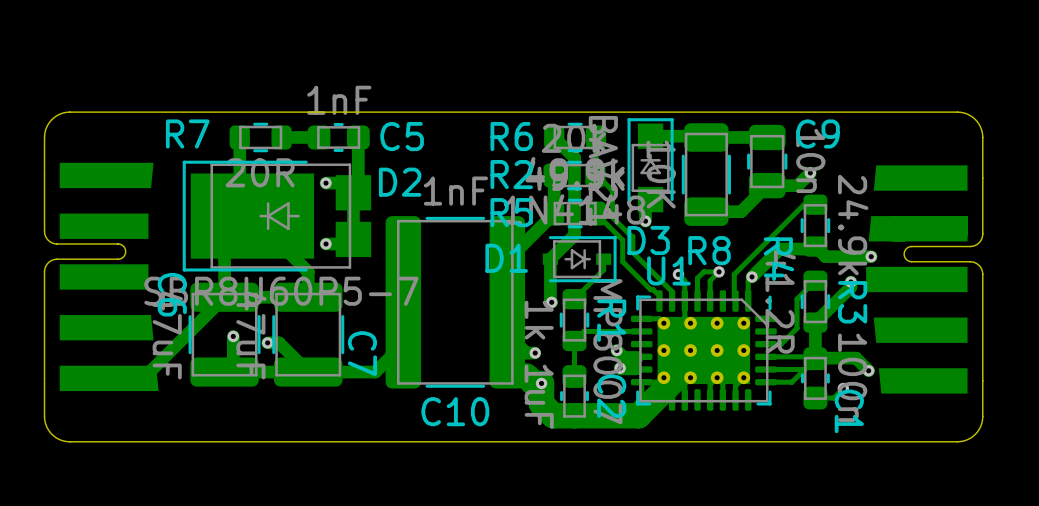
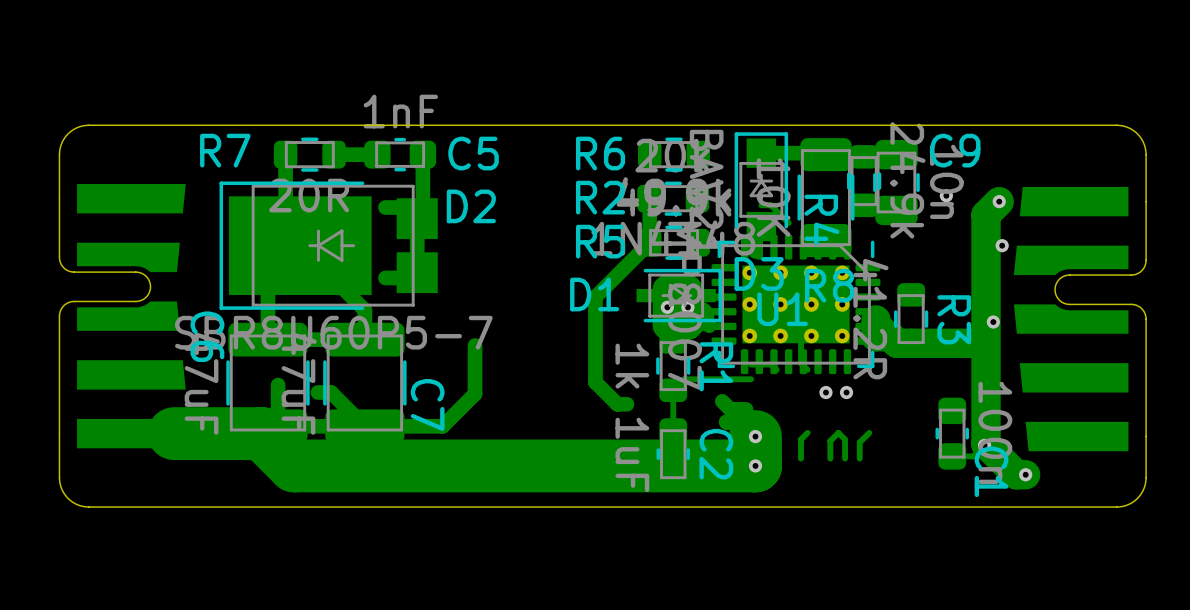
track: (554, 137) (574, 157) (574, 235) (550, 259) (551, 302) -> none
track: (596, 137) (595, 175) (612, 190) (612, 217) (632, 236) (632, 252) (672, 291) (672, 301) -> none
part footprint: [43, 162, 159, 392] -> [58, 184, 192, 449]
part footprint: [866, 165, 984, 394] -> [1013, 186, 1147, 452]
track: (810, 172) (797, 185) (767, 185) (741, 211) (706, 211) -> none
track: none -> (999, 201) (986, 214) (986, 444) (1016, 474) (1025, 474)
via: none -> (999, 201)
track: none -> (761, 205) (770, 205) (788, 223)
via: (326, 183) -> none
track: (815, 204) (804, 204) (734, 274) (735, 301) -> none
track: (596, 213) (622, 240) (622, 261) (659, 295) (659, 301) -> none
via: none -> (1002, 245)
via: (645, 221) -> none
R4 position: (815, 225) -> (864, 181)
via: (326, 243) -> none
track: (815, 246) (825, 256) (871, 256) -> none
track: (817, 249) (779, 249) (748, 280) (748, 301) -> none
track: none -> (687, 289) (667, 289) (667, 324) (687, 324) (696, 316) (699, 316) (709, 325)
via: (871, 256) -> none
track: (603, 259) (603, 269) (574, 299) -> none
via: none -> (667, 307)
via: none -> (687, 307)
via: (719, 271) -> none
via: (678, 274) -> none
via: (752, 276) -> none
track: none -> (875, 319) (875, 336) (890, 336) (897, 343) (973, 343)
track: (815, 280) (797, 299) (797, 328) (781, 344) (765, 344) -> none
track: (850, 282) (850, 287) (815, 322) (815, 358) -> none
track: (224, 297) (143, 378) -> (755, 436) (755, 465) (294, 465) (262, 433) (174, 433)
track: (710, 301) (710, 280) (719, 271) (703, 271) (697, 278) (697, 301) -> none
R3 position: (815, 301) -> (911, 319)
C10: 1nF (455, 302) -> none
via: (551, 302) -> none
via: (233, 336) -> none
via: (267, 342) -> none
via: none -> (825, 392)
via: none -> (846, 392)
via: (616, 350) -> none
track: (703, 350) (638, 415) (553, 415) (541, 403) (541, 383) (533, 383) (526, 375) -> none
U1 position: (703, 350) -> (796, 304)
via: (535, 353) -> none
track: (765, 356) (813, 356) (815, 358) -> none
track: (815, 358) (855, 358) (868, 370) -> none
track: (815, 358) (791, 382) (765, 382) -> none
via: (620, 368) -> none
track: (804, 369) (765, 369) -> none
via position: (868, 370) -> (1025, 474)
via: none -> (755, 436)
via: (541, 383) -> none
via: none -> (755, 465)

